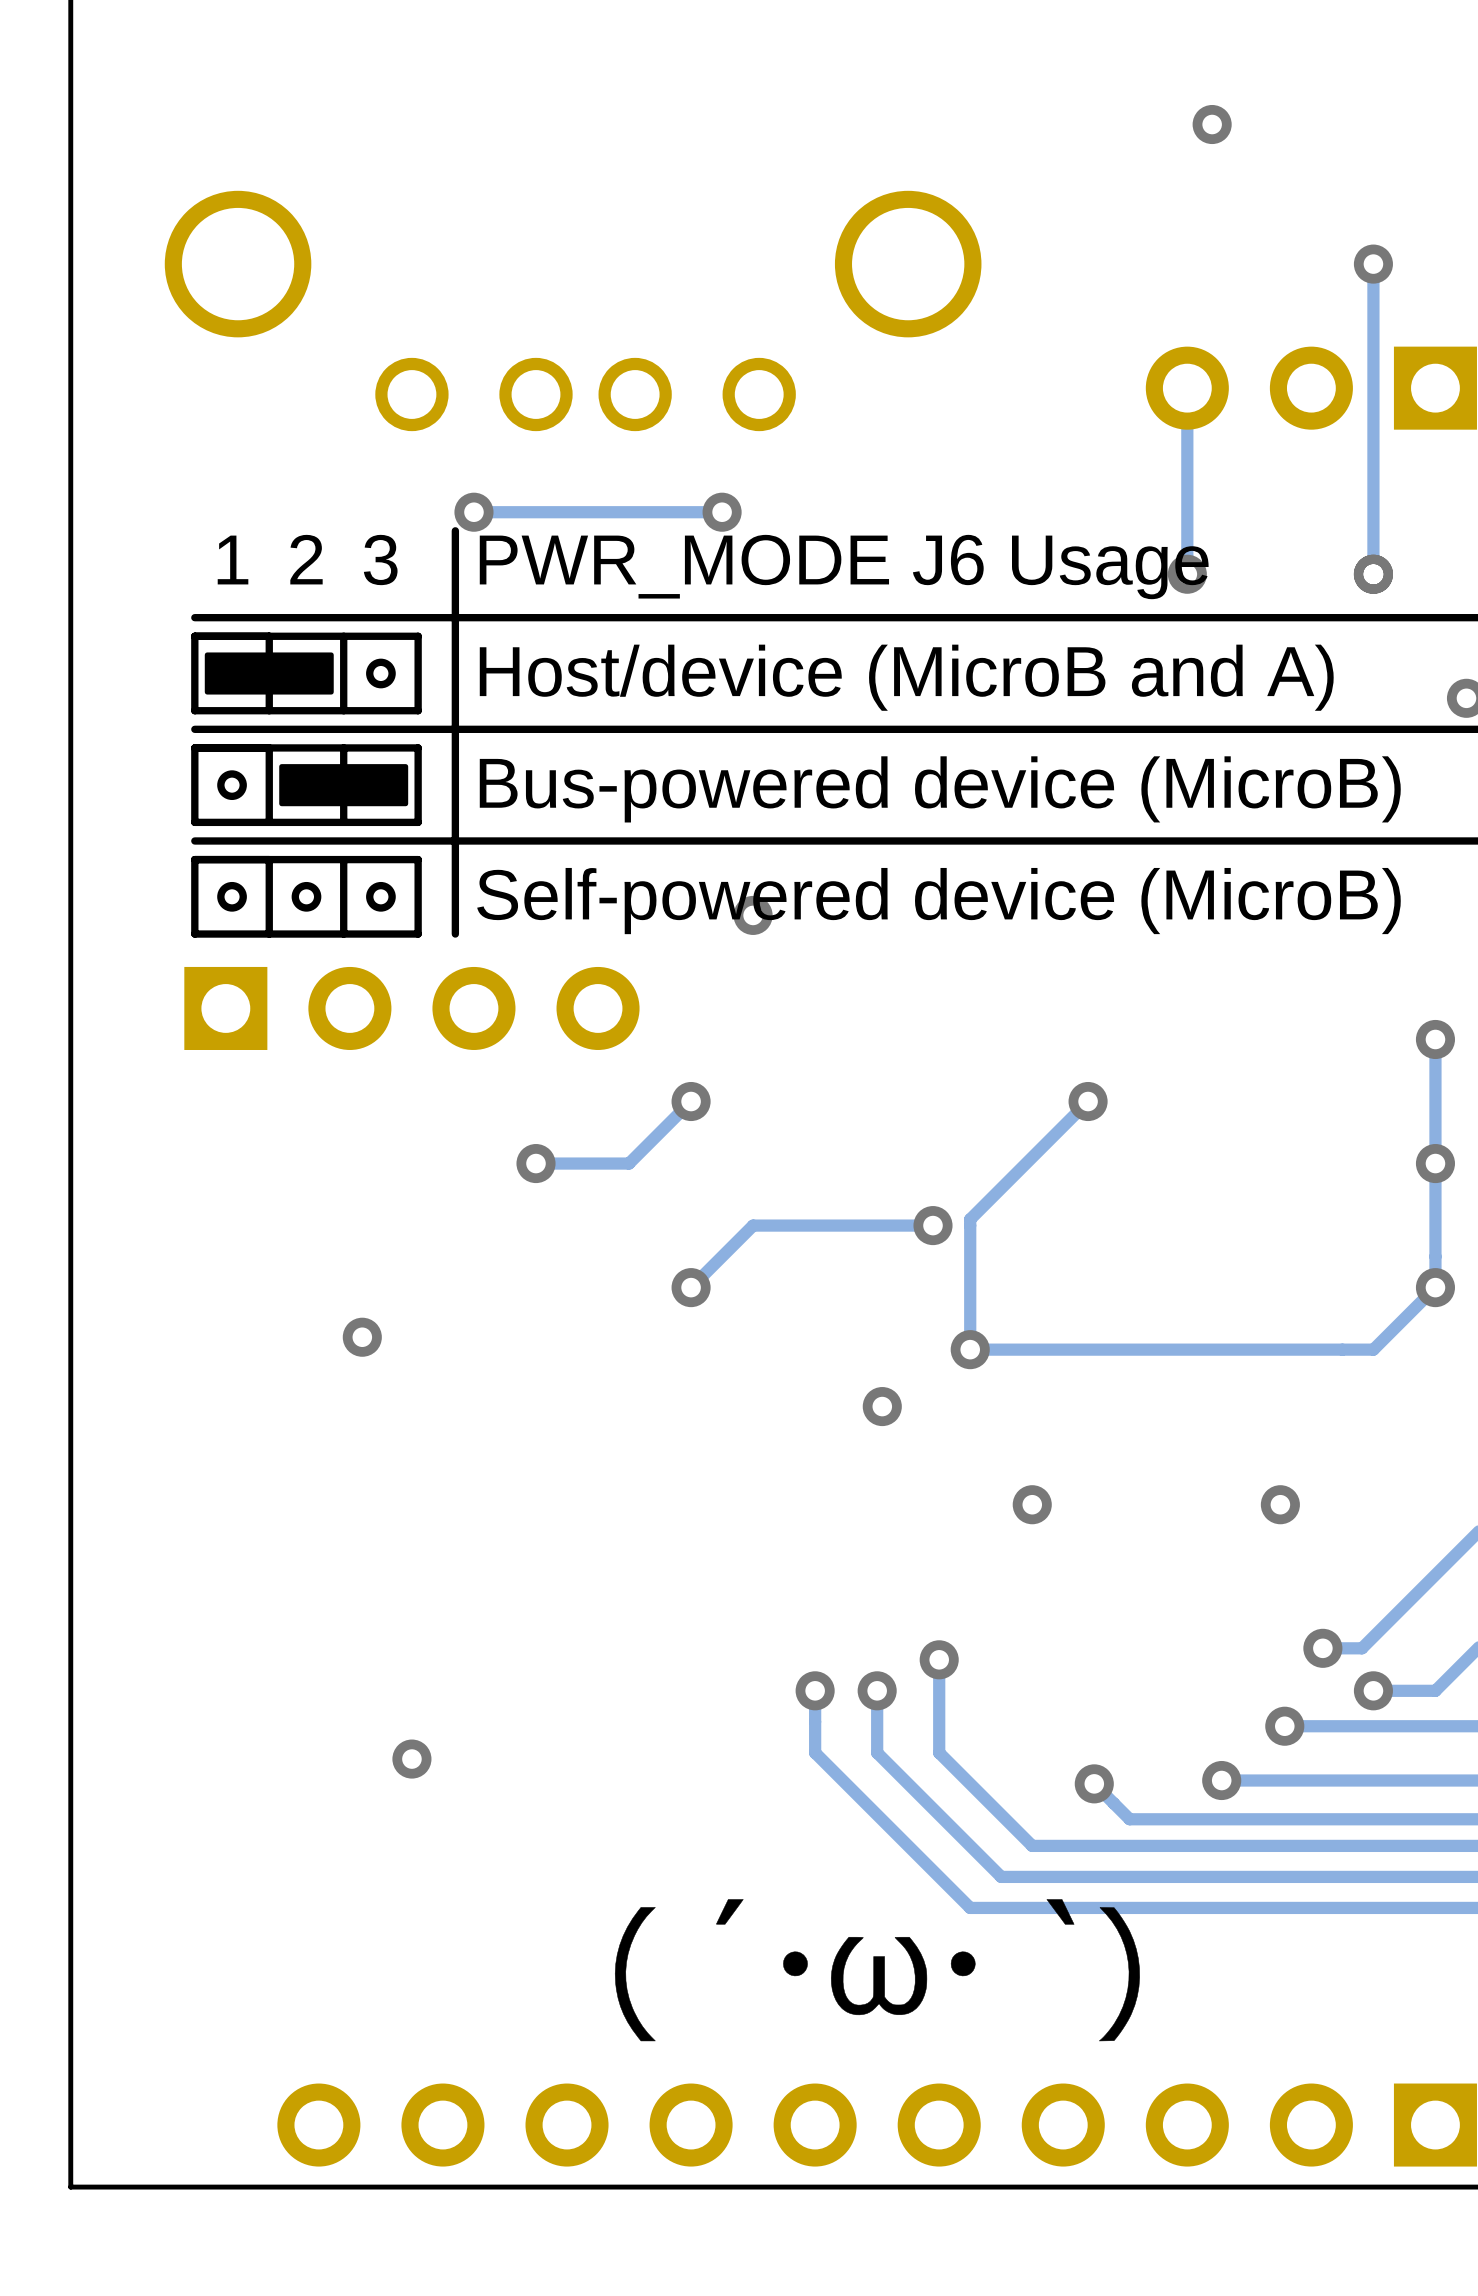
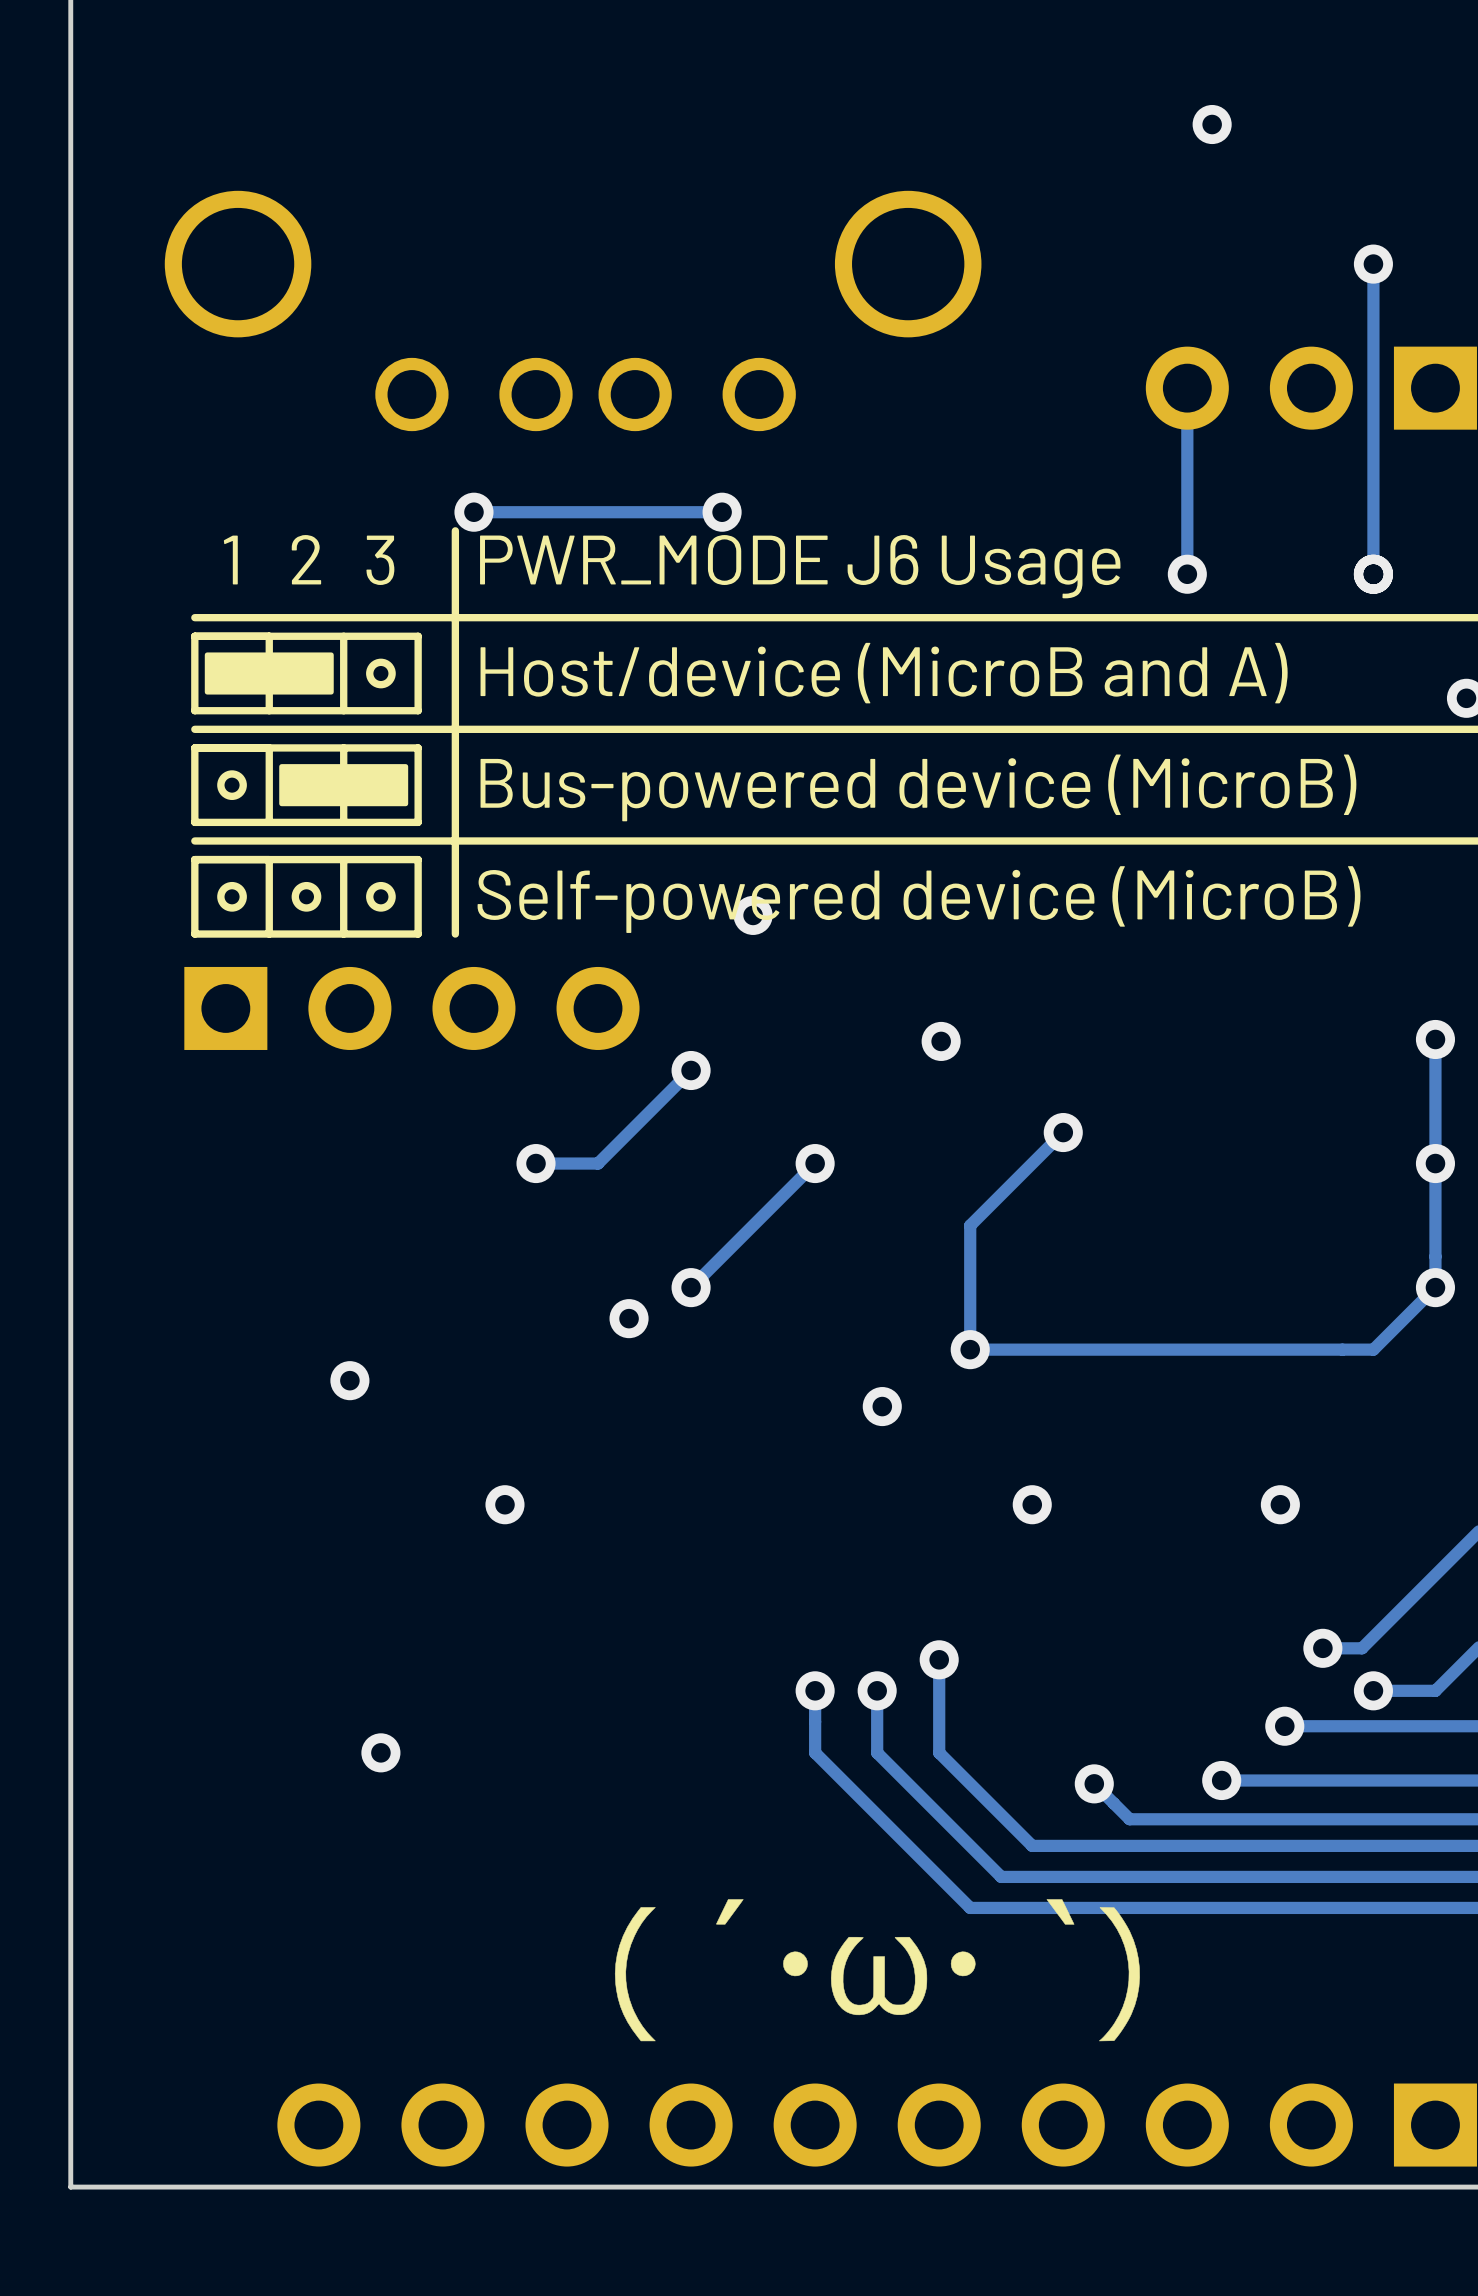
via: none -> (941, 1041)
track: (691, 1101) (629, 1163) (598, 1163) -> (691, 1070) (598, 1163)
via position: (691, 1101) -> (691, 1070)
track: (1088, 1101) (970, 1219) (970, 1225) -> (1063, 1132) (970, 1225)
via position: (1088, 1101) -> (1063, 1132)
via: none -> (815, 1163)
track: (933, 1225) (753, 1225) -> (815, 1163) (753, 1225)
via: (933, 1225) -> none
via: none -> (629, 1318)
via position: (362, 1337) -> (349, 1380)
via: none -> (504, 1504)
via position: (411, 1759) -> (380, 1752)

